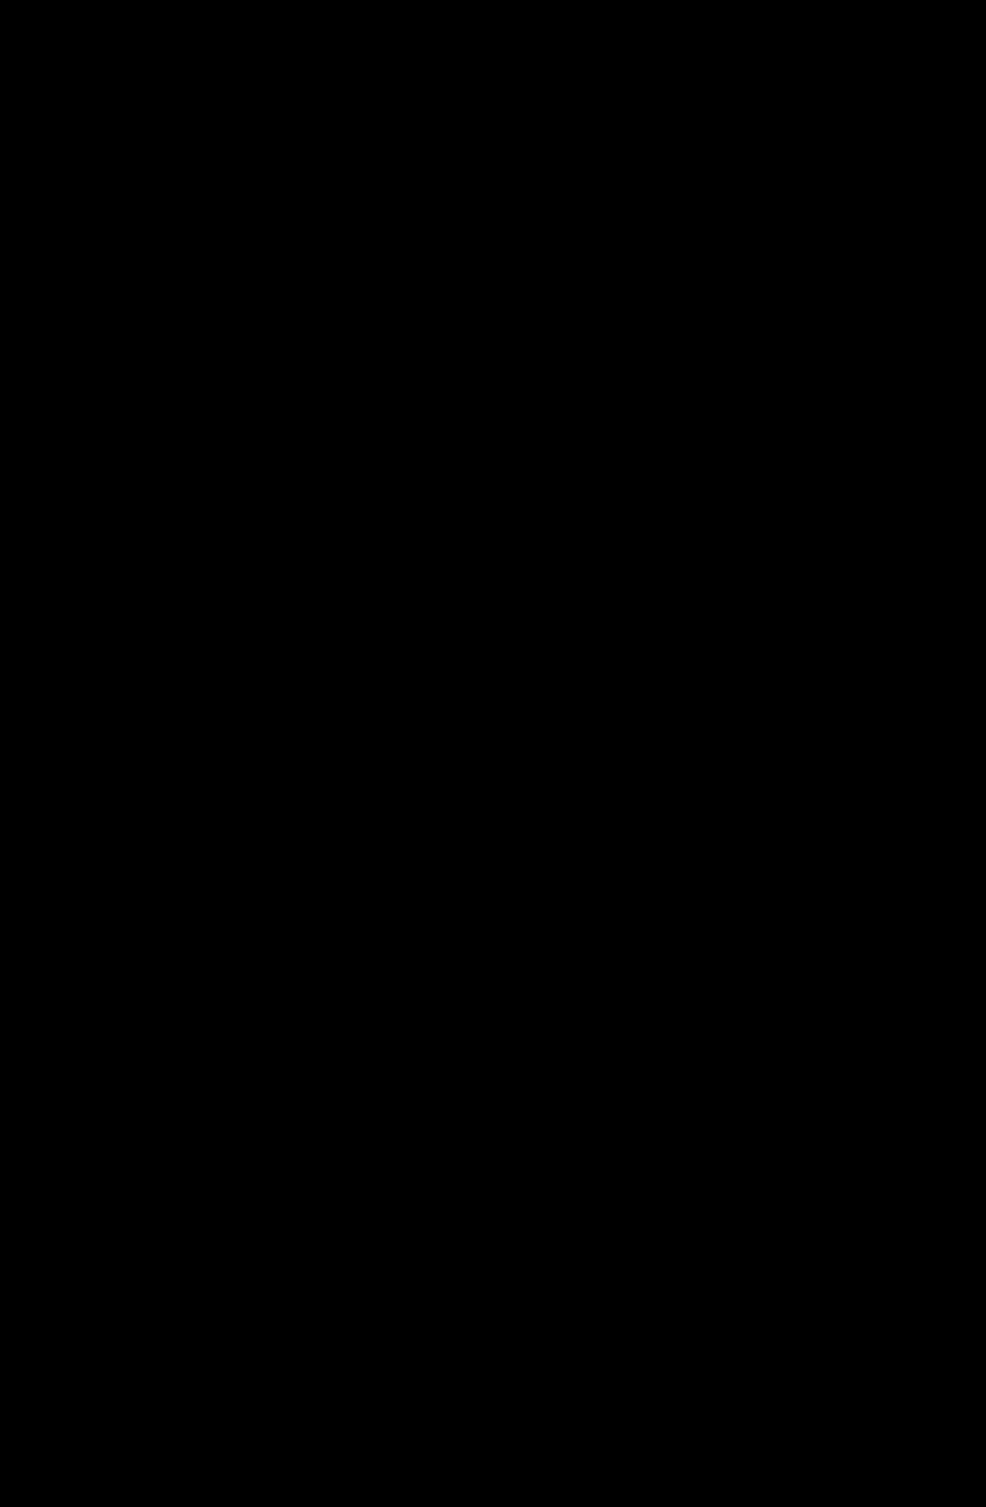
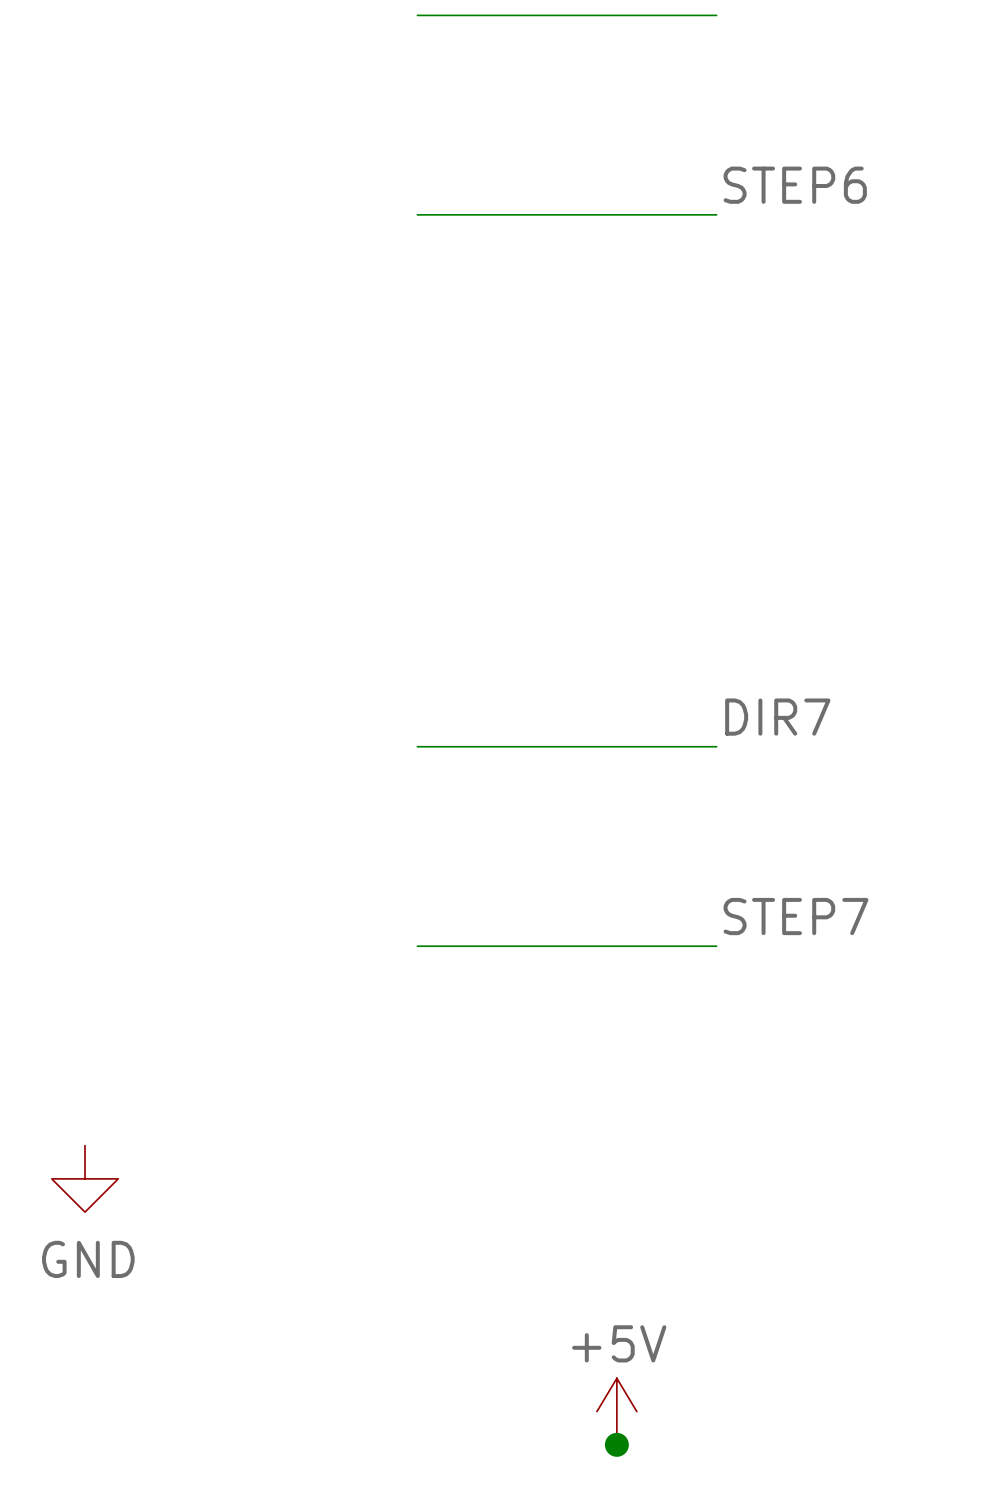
wire: none -> (417, 15) (716, 15)
label: none -> STEP6 (795, 185)
wire: none -> (417, 214) (716, 214)
label: none -> DIR7 (777, 717)
wire: none -> (417, 746) (716, 746)
label: none -> STEP7 (796, 916)
wire: none -> (417, 946) (716, 946)
power symbol: none -> GND (85, 1178)
power symbol: none -> +5V (616, 1411)
junction: none -> (616, 1444)

